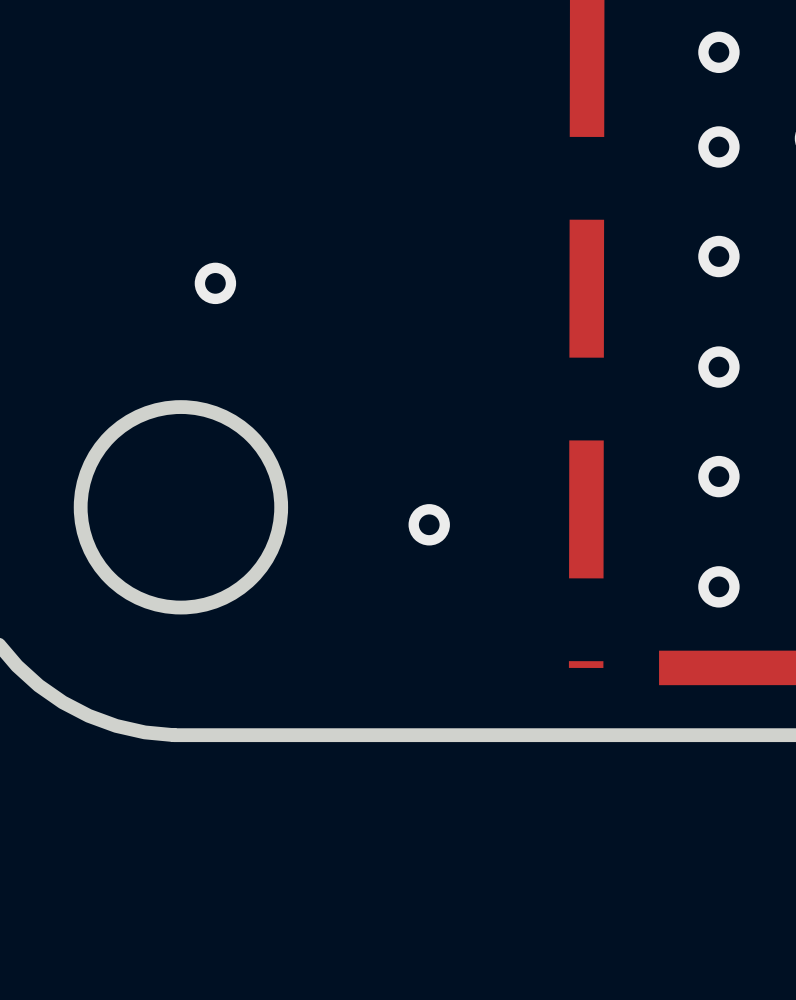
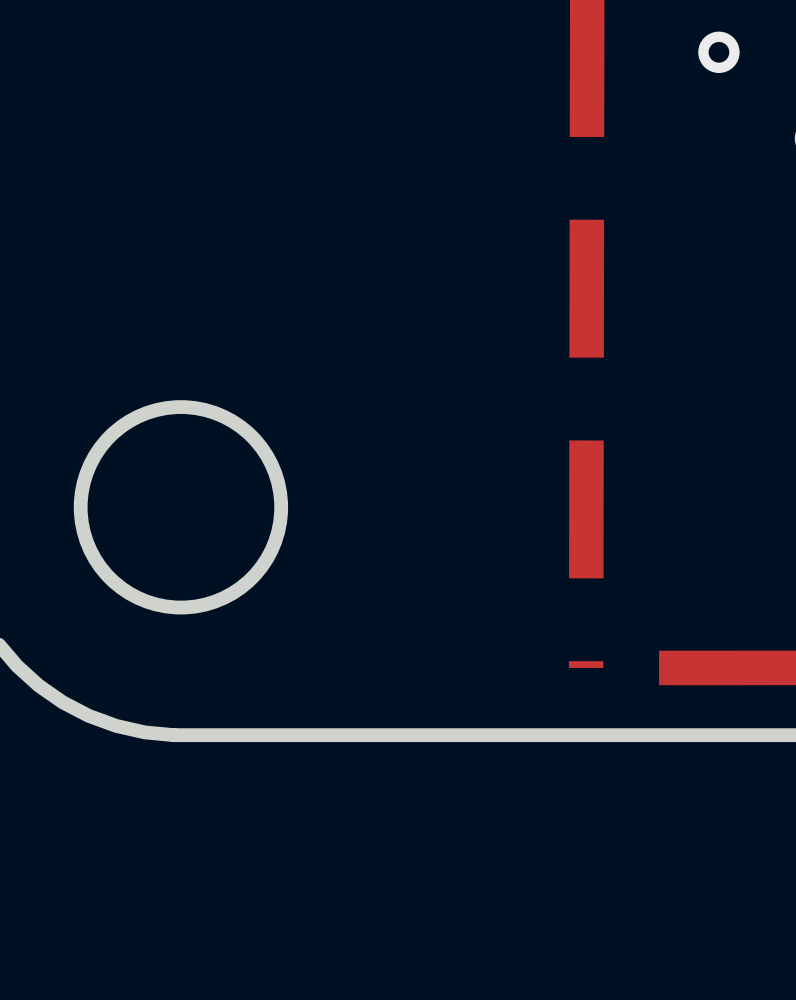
via: (718, 146) -> none
via: (718, 256) -> none
via: (215, 283) -> none
via: (718, 367) -> none
via: (718, 476) -> none
via: (429, 524) -> none
via: (718, 586) -> none

